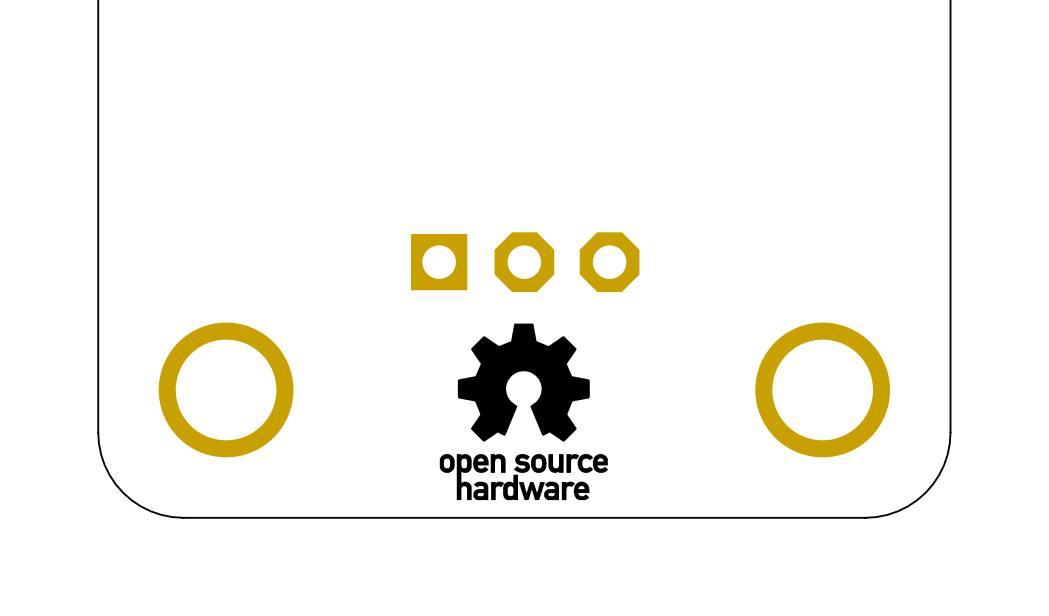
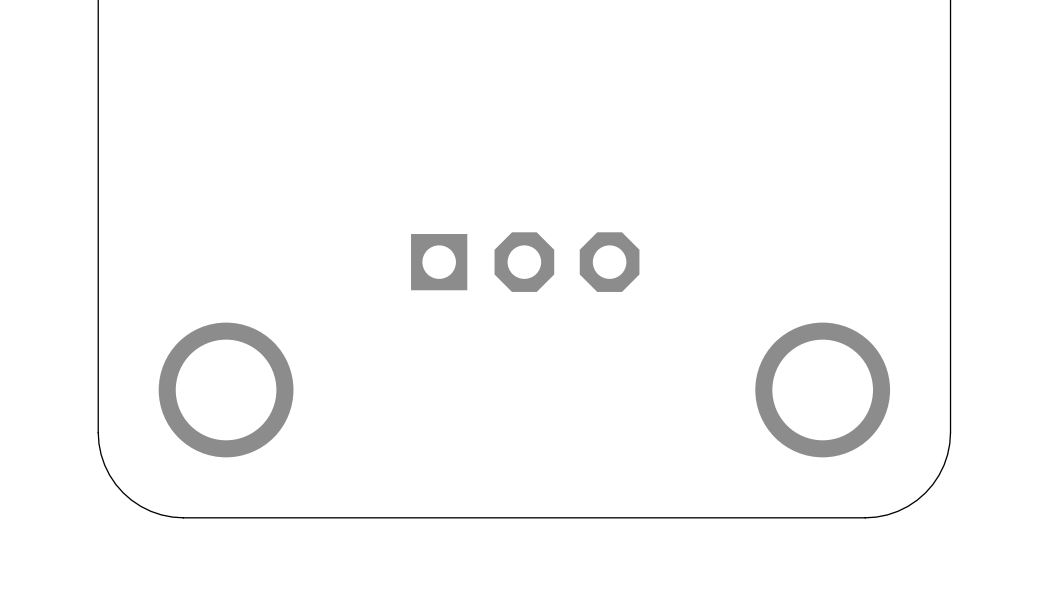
drawing: [439, 323, 608, 501] -> none

